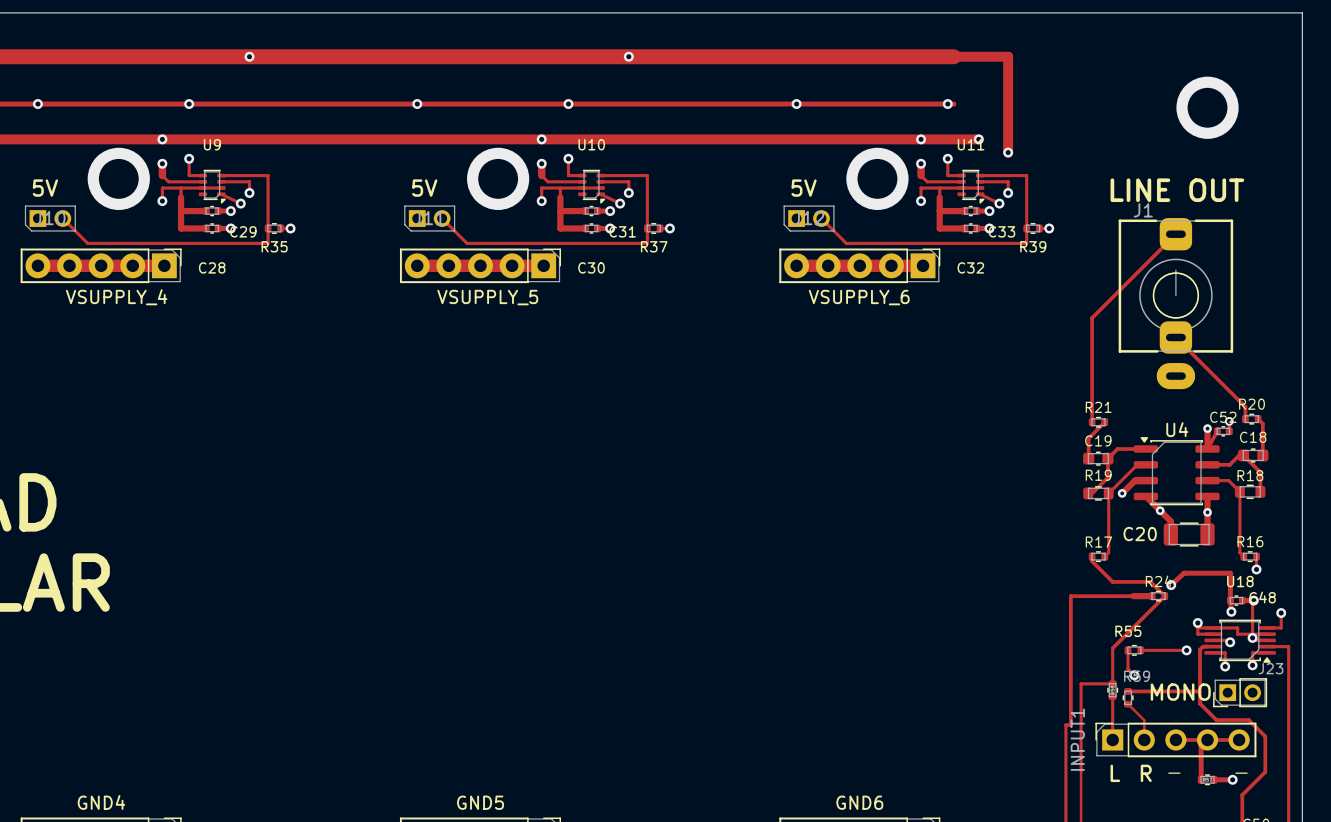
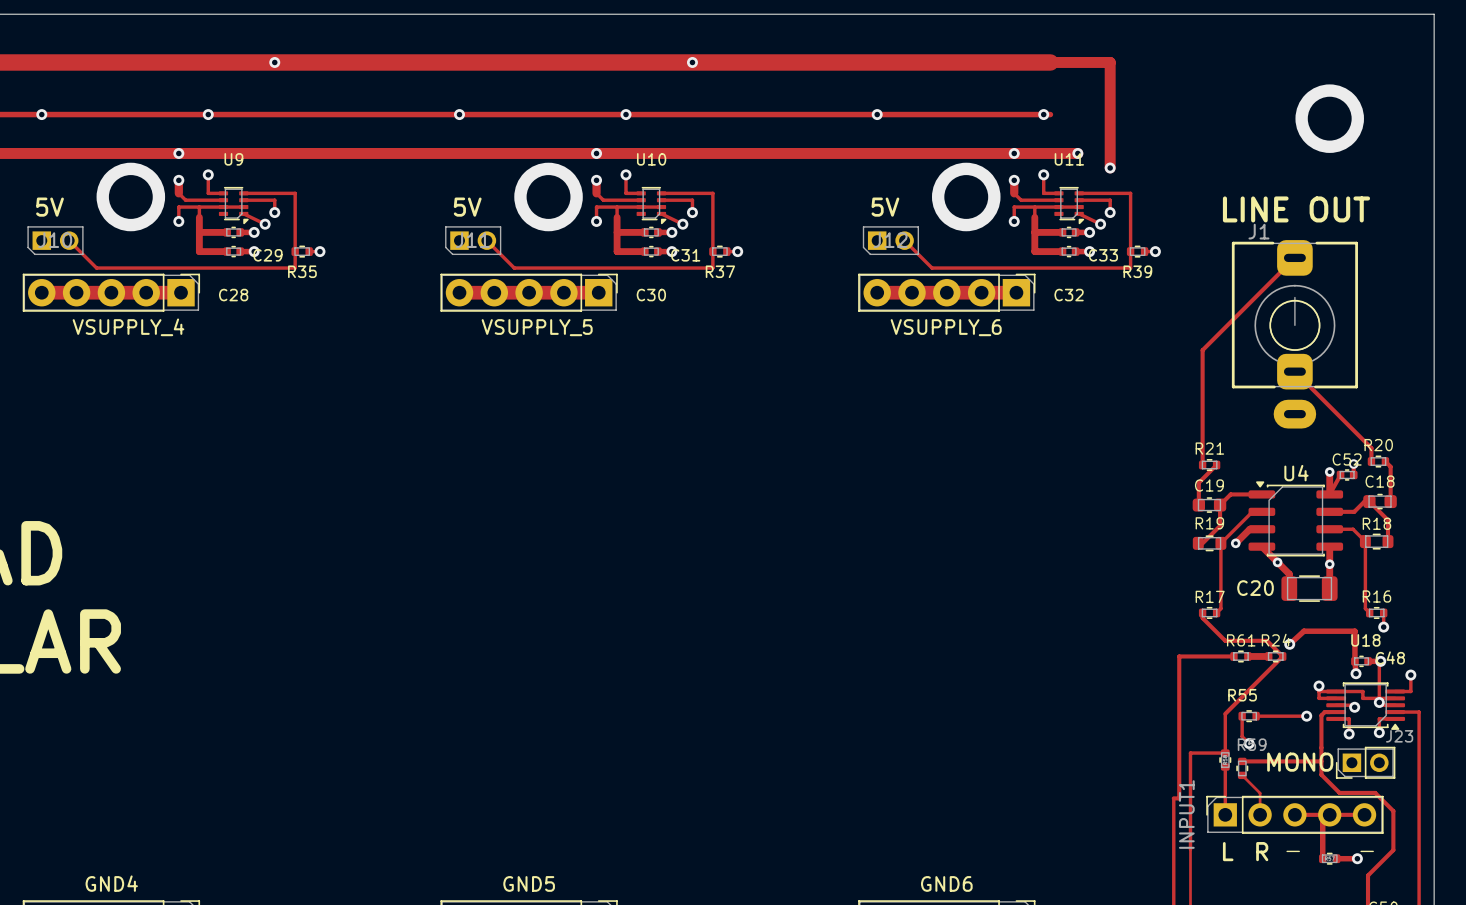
track: (1120, 596) (1133, 596) -> none
R61: none -> (1240, 656)

